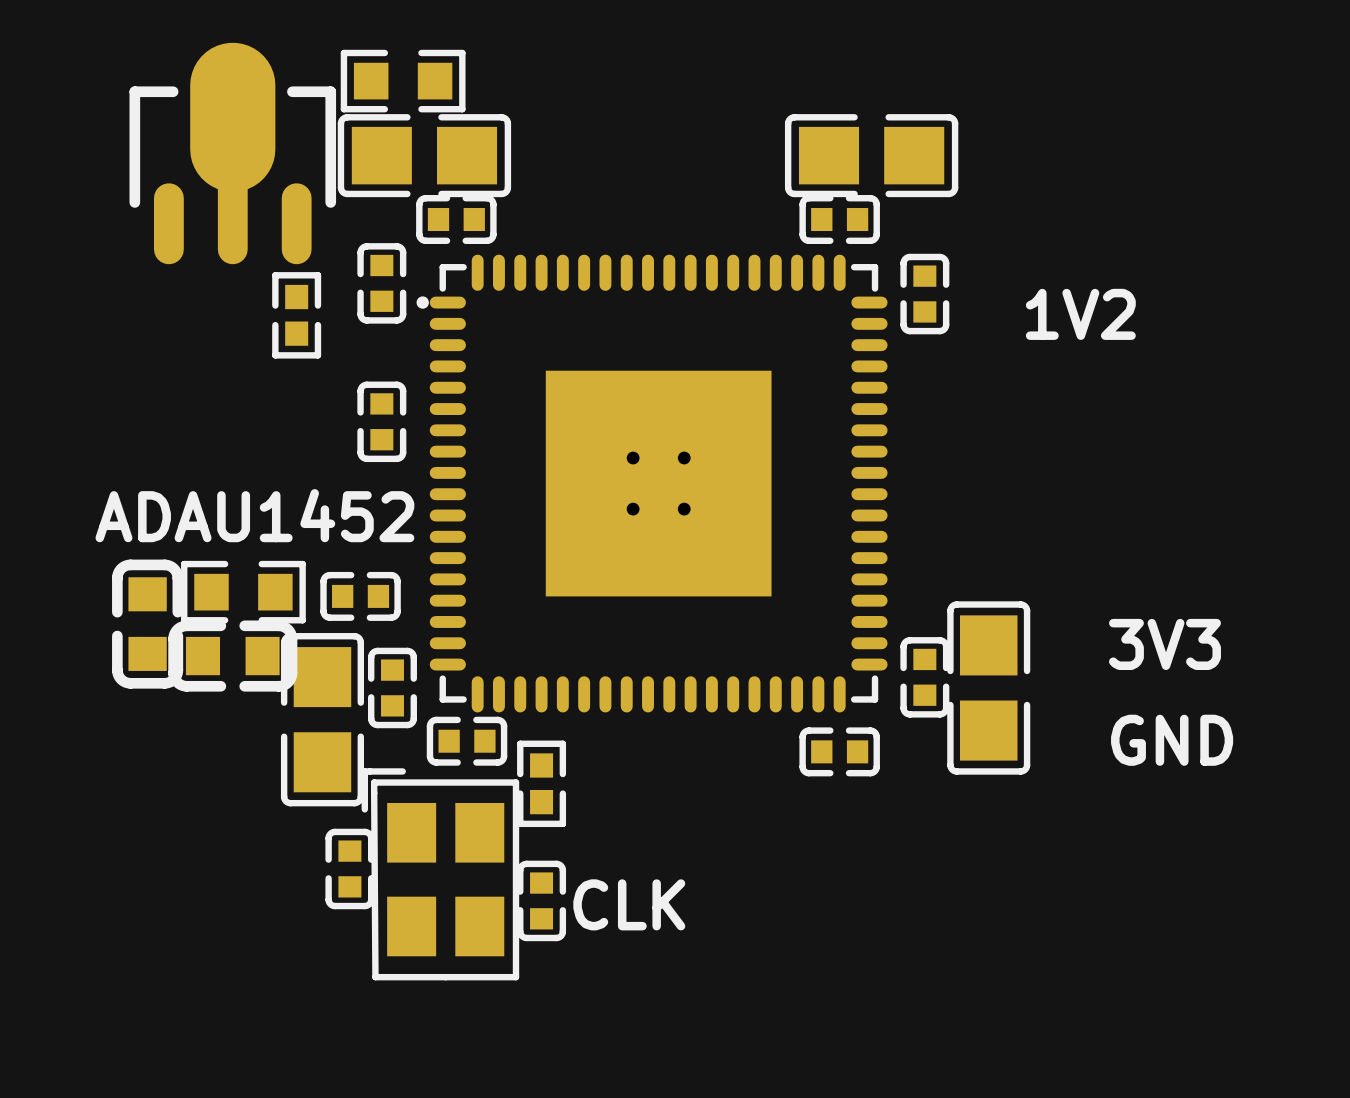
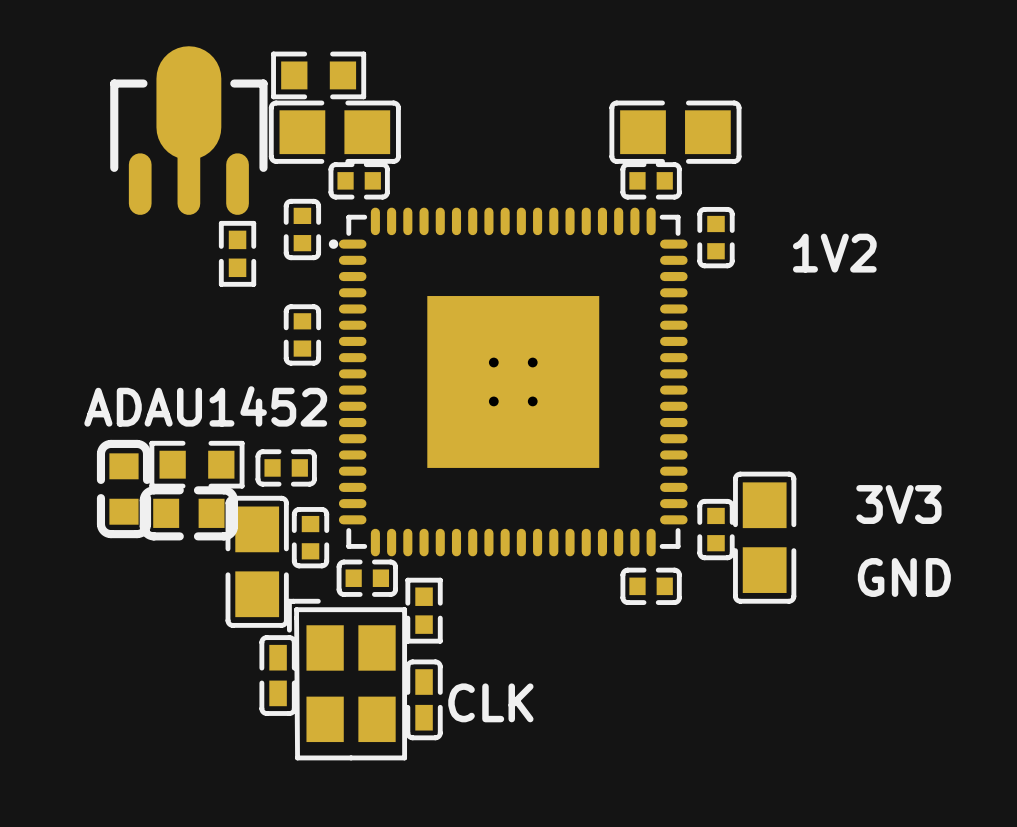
part footprint: [325, 828, 375, 910] -> [259, 635, 297, 716]
part footprint: [517, 860, 567, 942] -> [405, 659, 443, 741]

